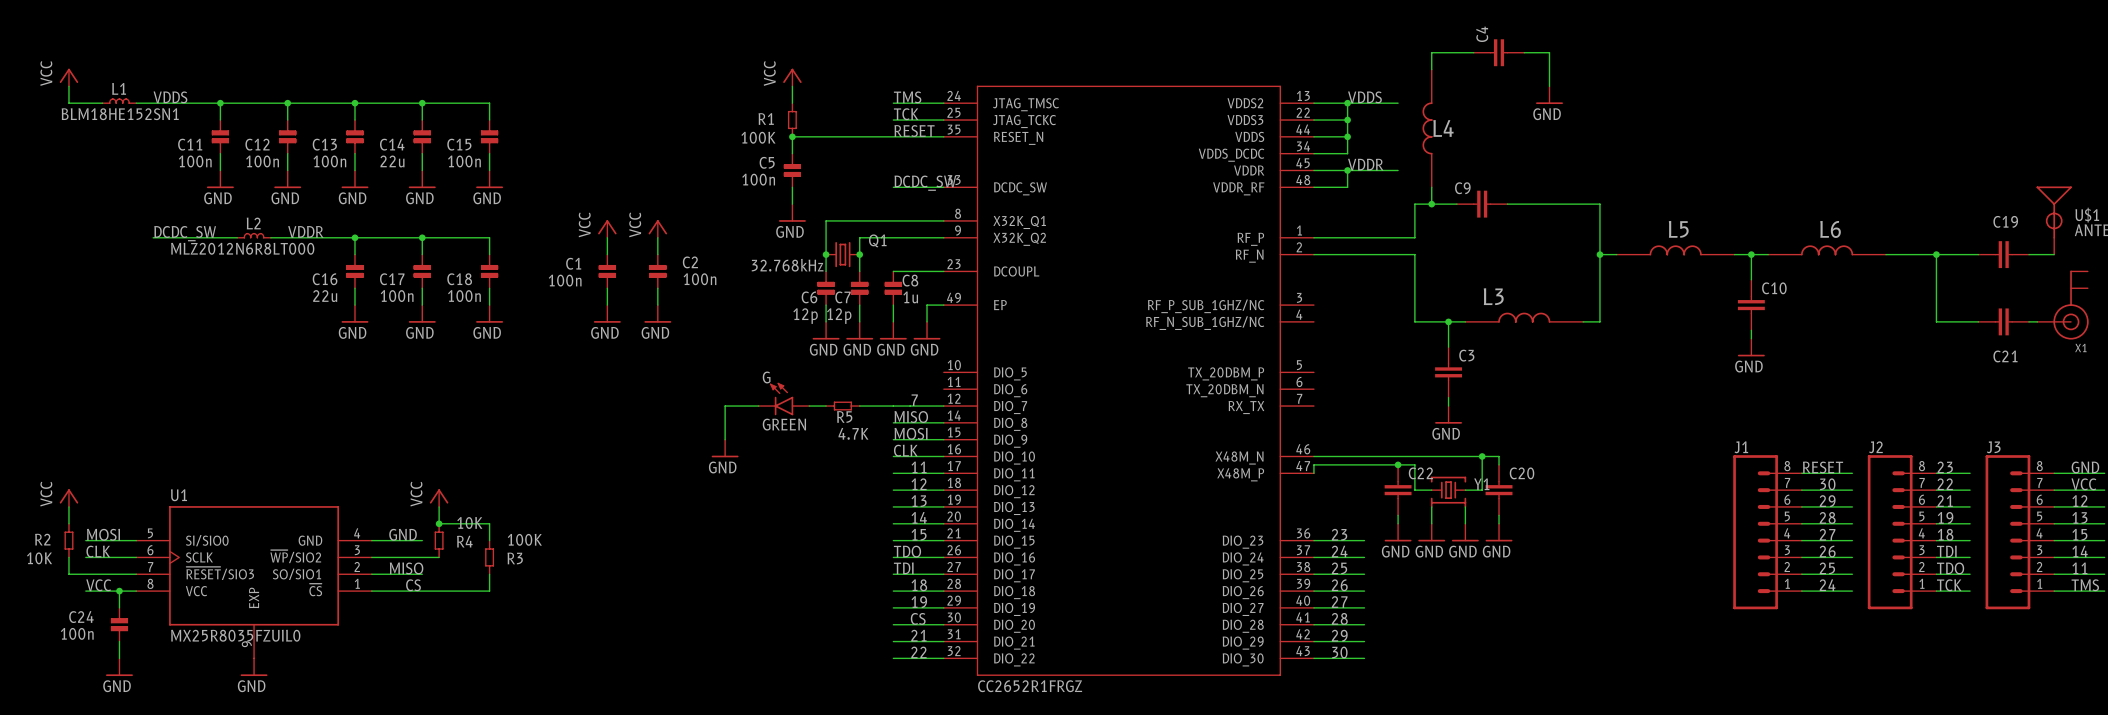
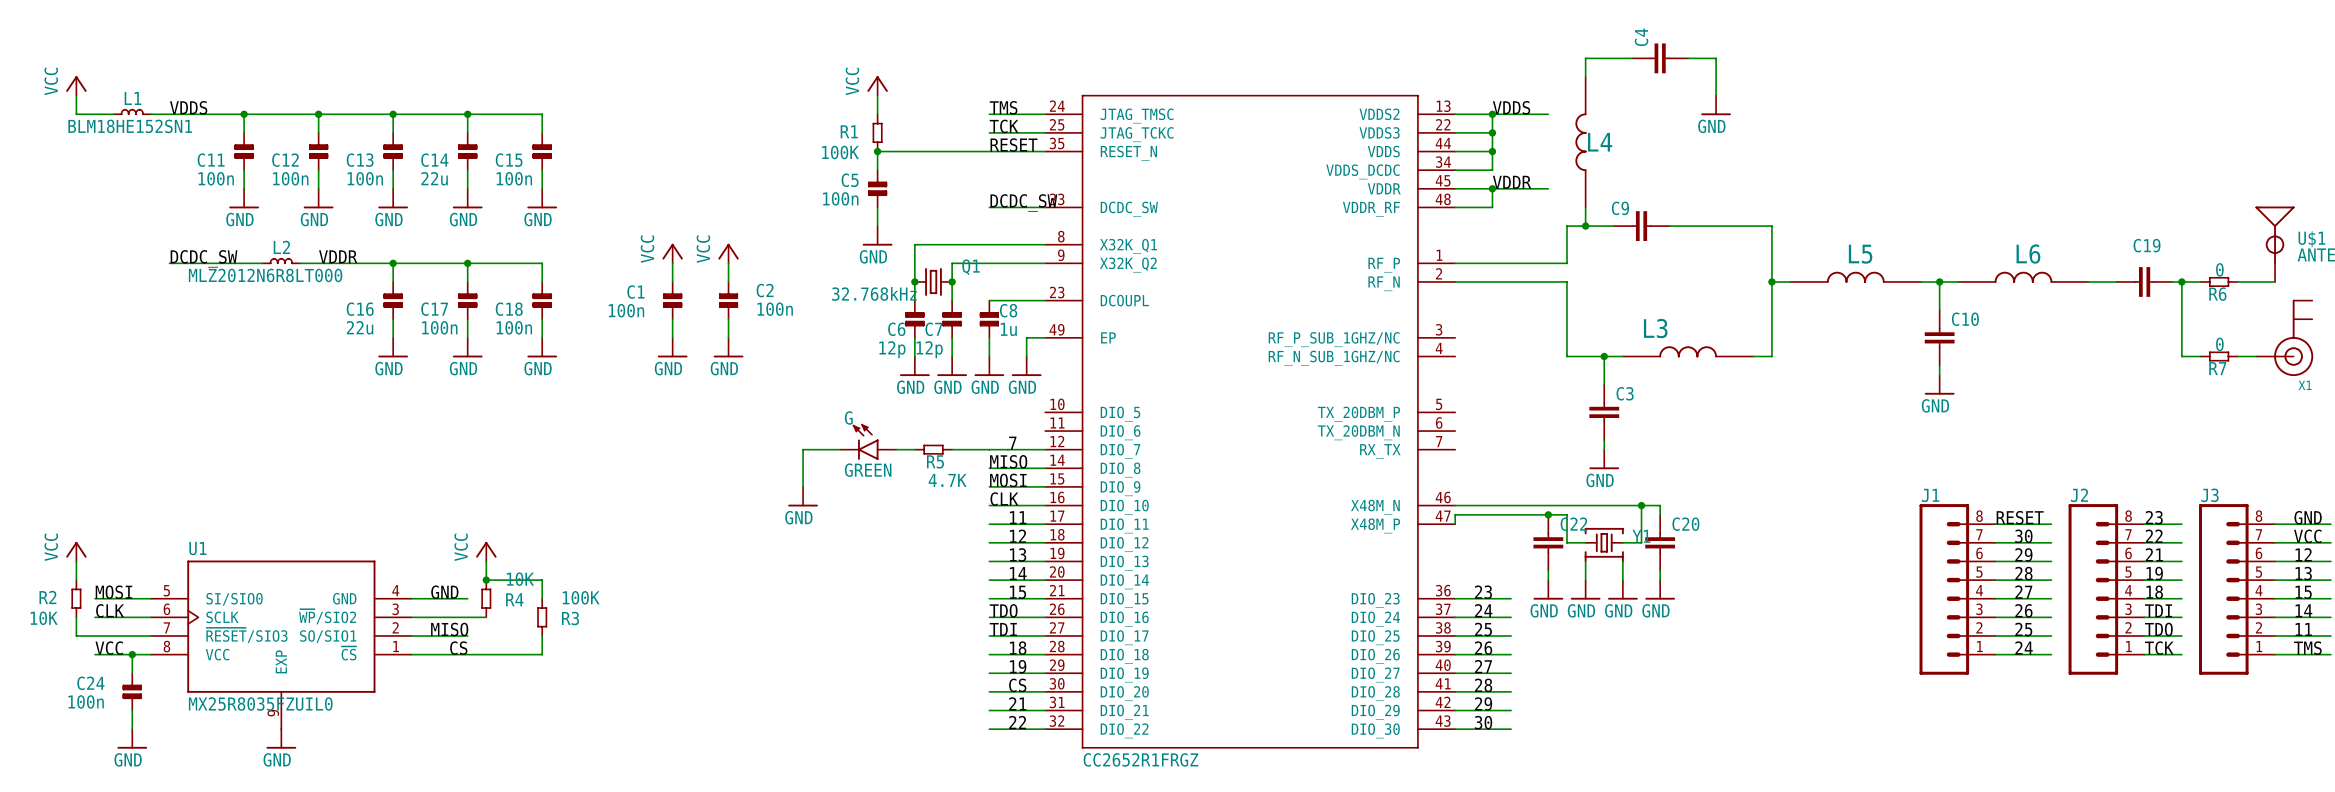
wire: (1936, 254) (1936, 321) (1970, 321) -> (2181, 281) (2181, 356)
junction position: (1936, 254) -> (2181, 281)
C19 position: (2003, 254) -> (2144, 281)
R6: none -> 0 (2219, 281)
C21: (2003, 321) -> none
R7: none -> 0 (2219, 356)

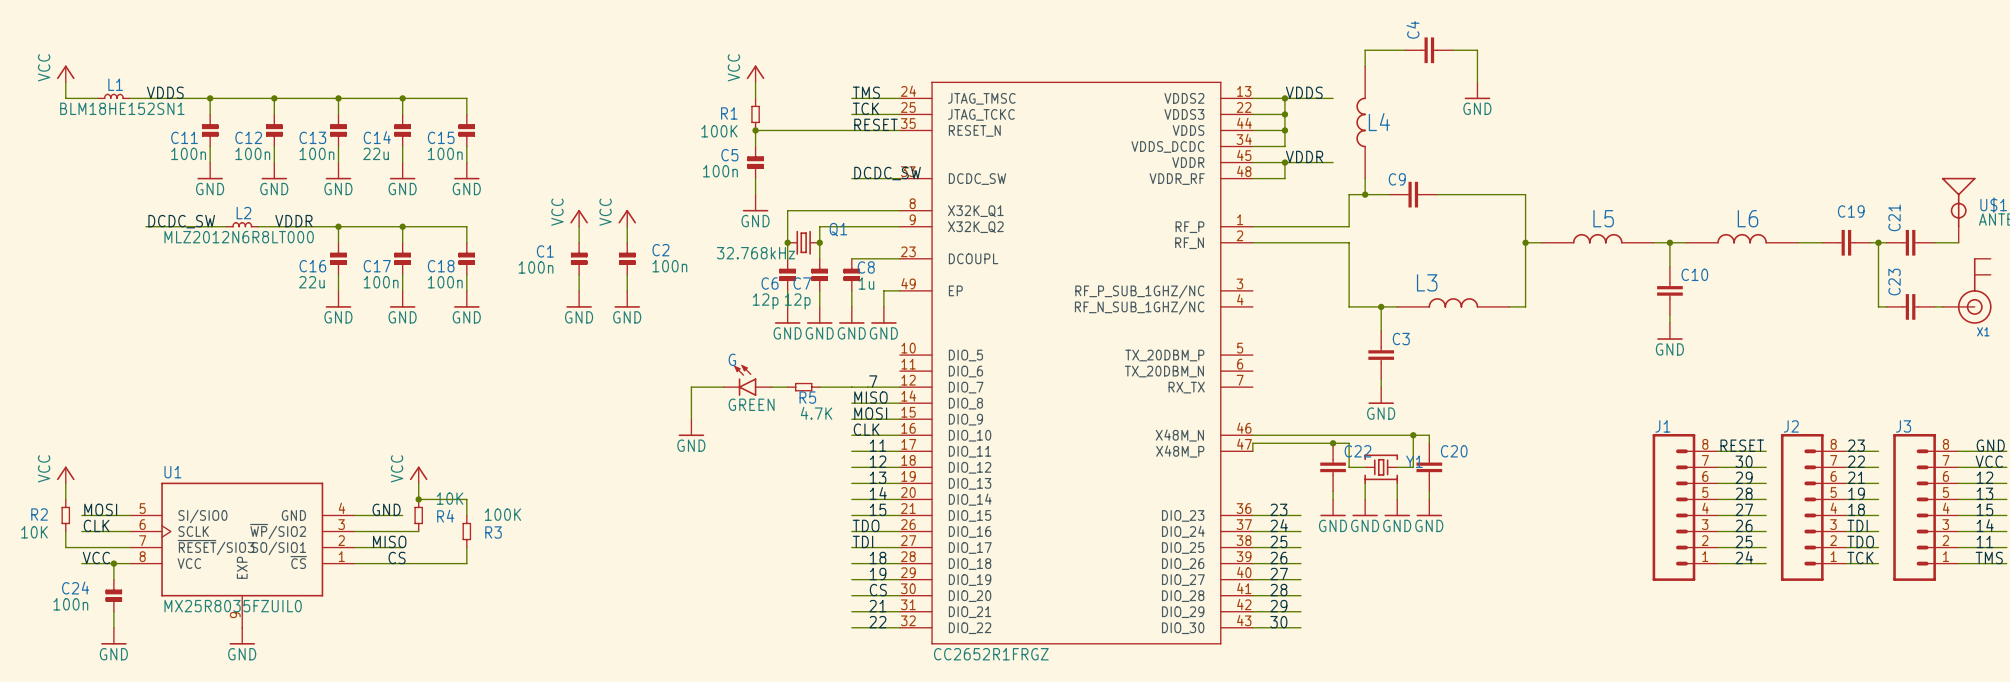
R6: 0 (2219, 281) -> none
C21: none -> (1910, 242)
R7: 0 (2219, 356) -> none
C23: none -> (1910, 306)

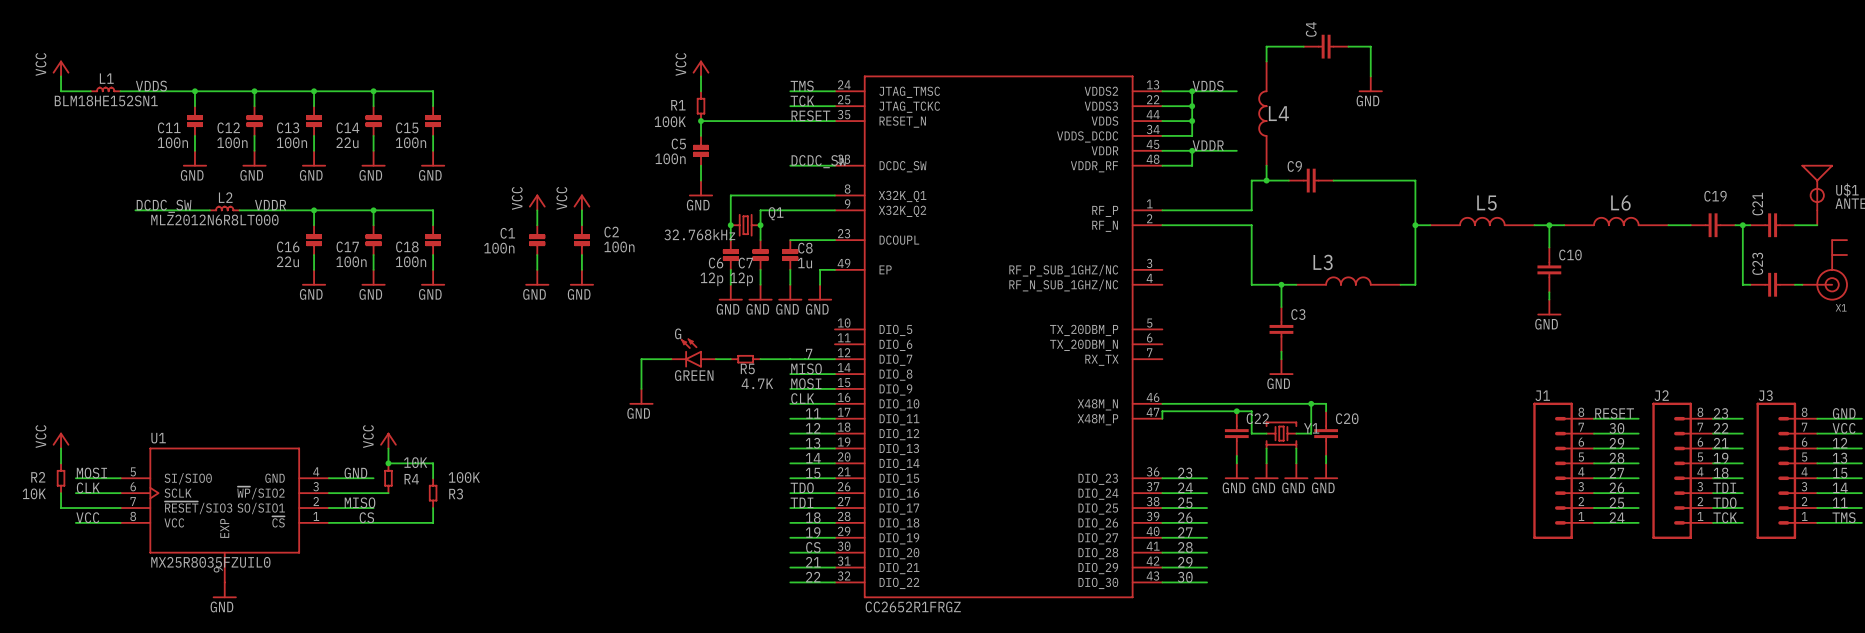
wire: (113, 563) (113, 579) -> none
junction: (113, 563) -> none
C24: 100n (113, 595) -> none
wire: (113, 611) (113, 627) -> none
power symbol: GND (113, 636) -> none

